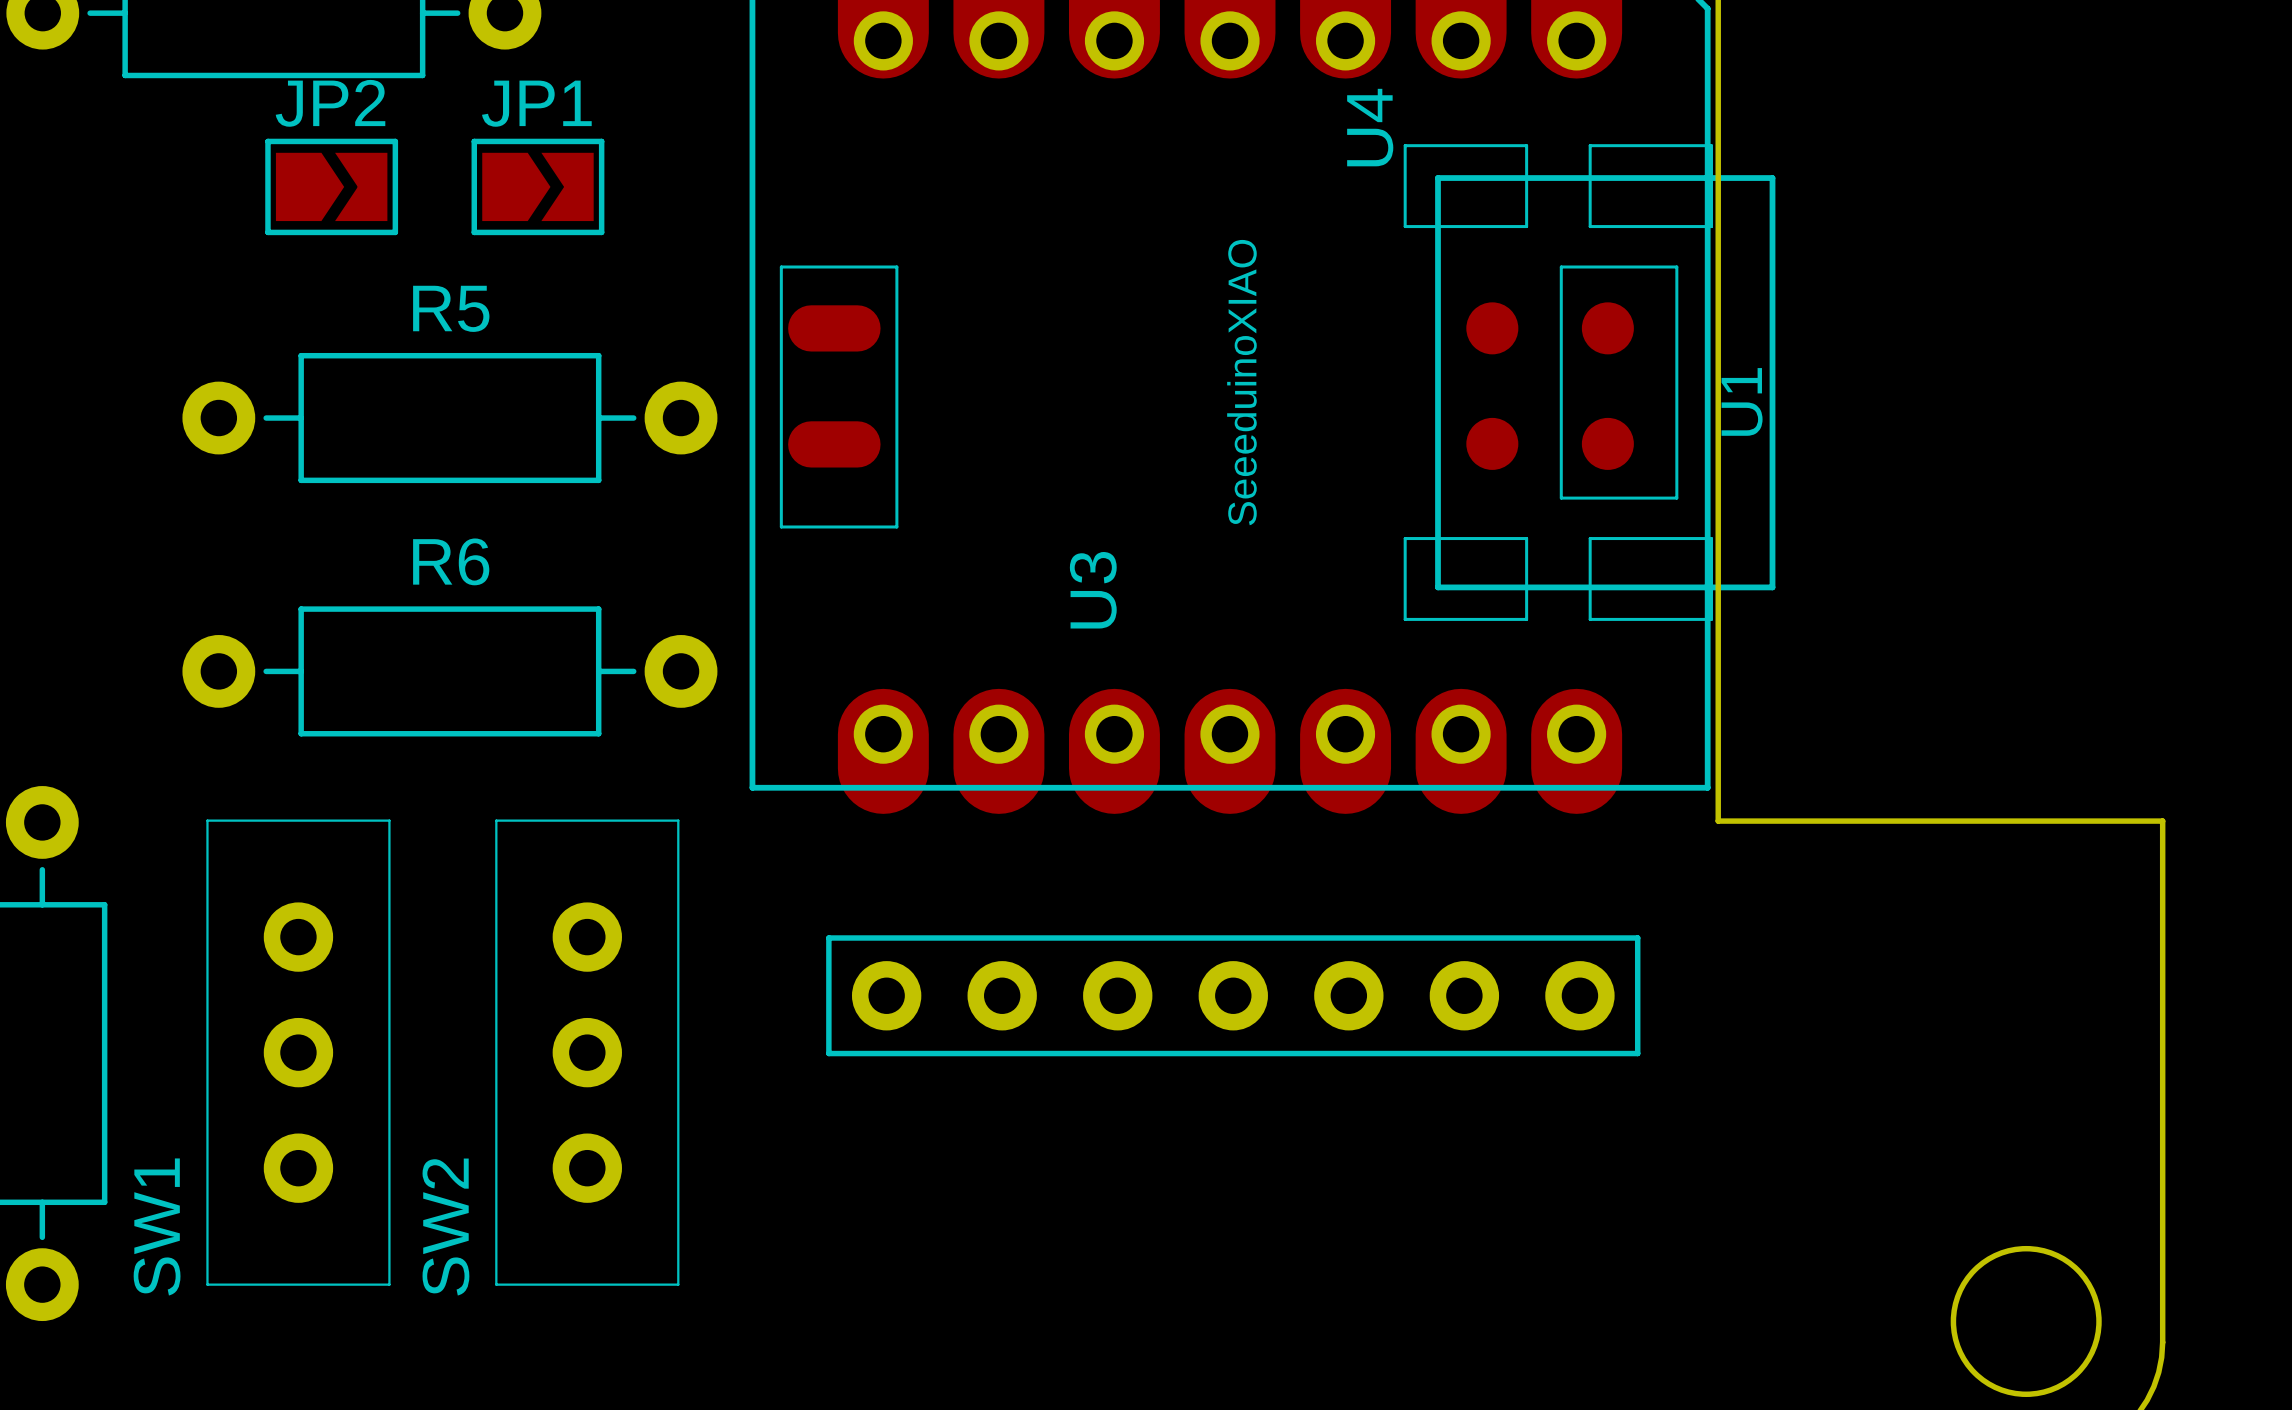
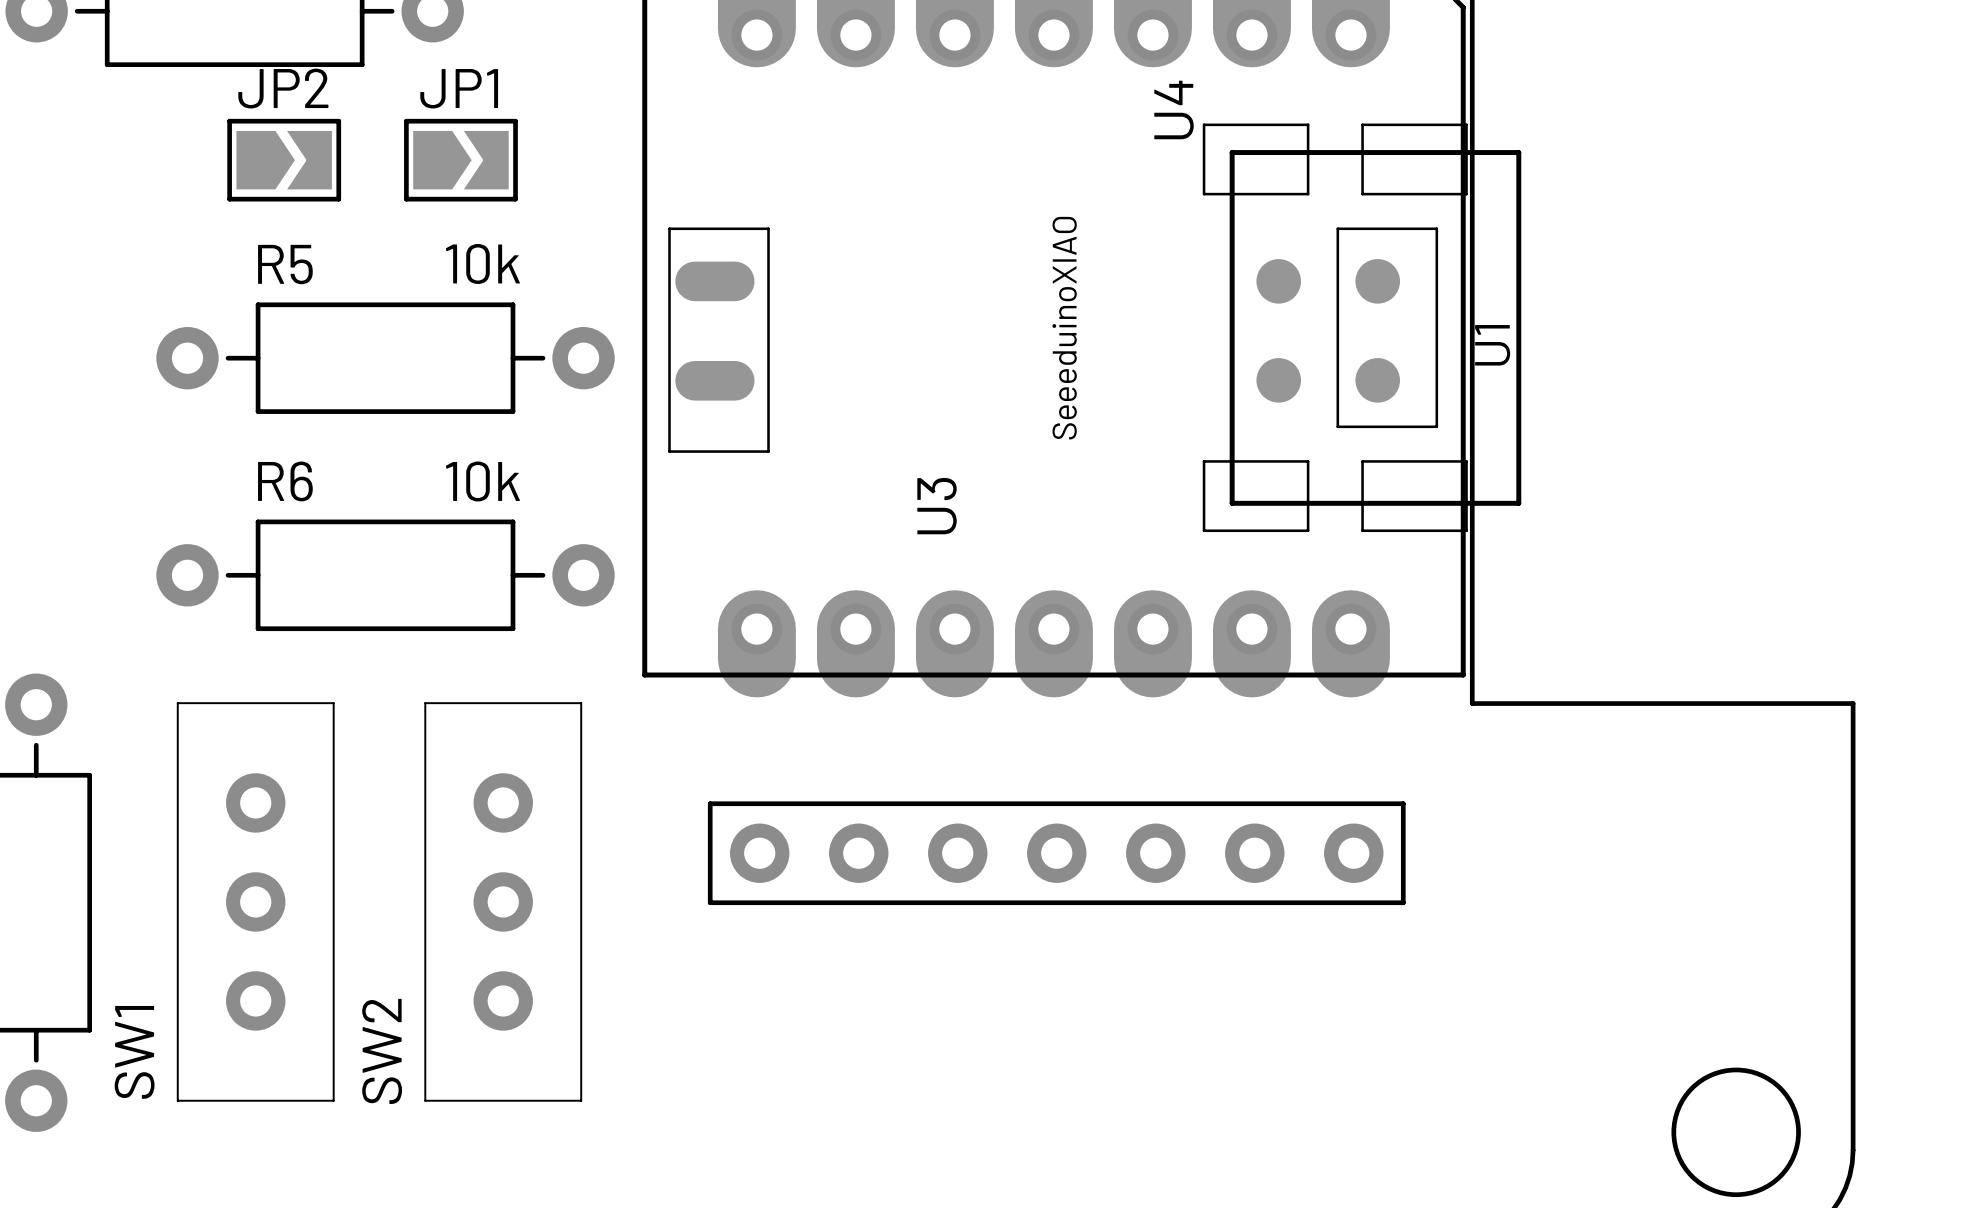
text: none -> 10k (482, 263)
R5 name position: R5 (451, 308) -> R5 (285, 264)
R6 name position: R6 (451, 561) -> R6 (285, 481)
text: none -> 10k (482, 481)

